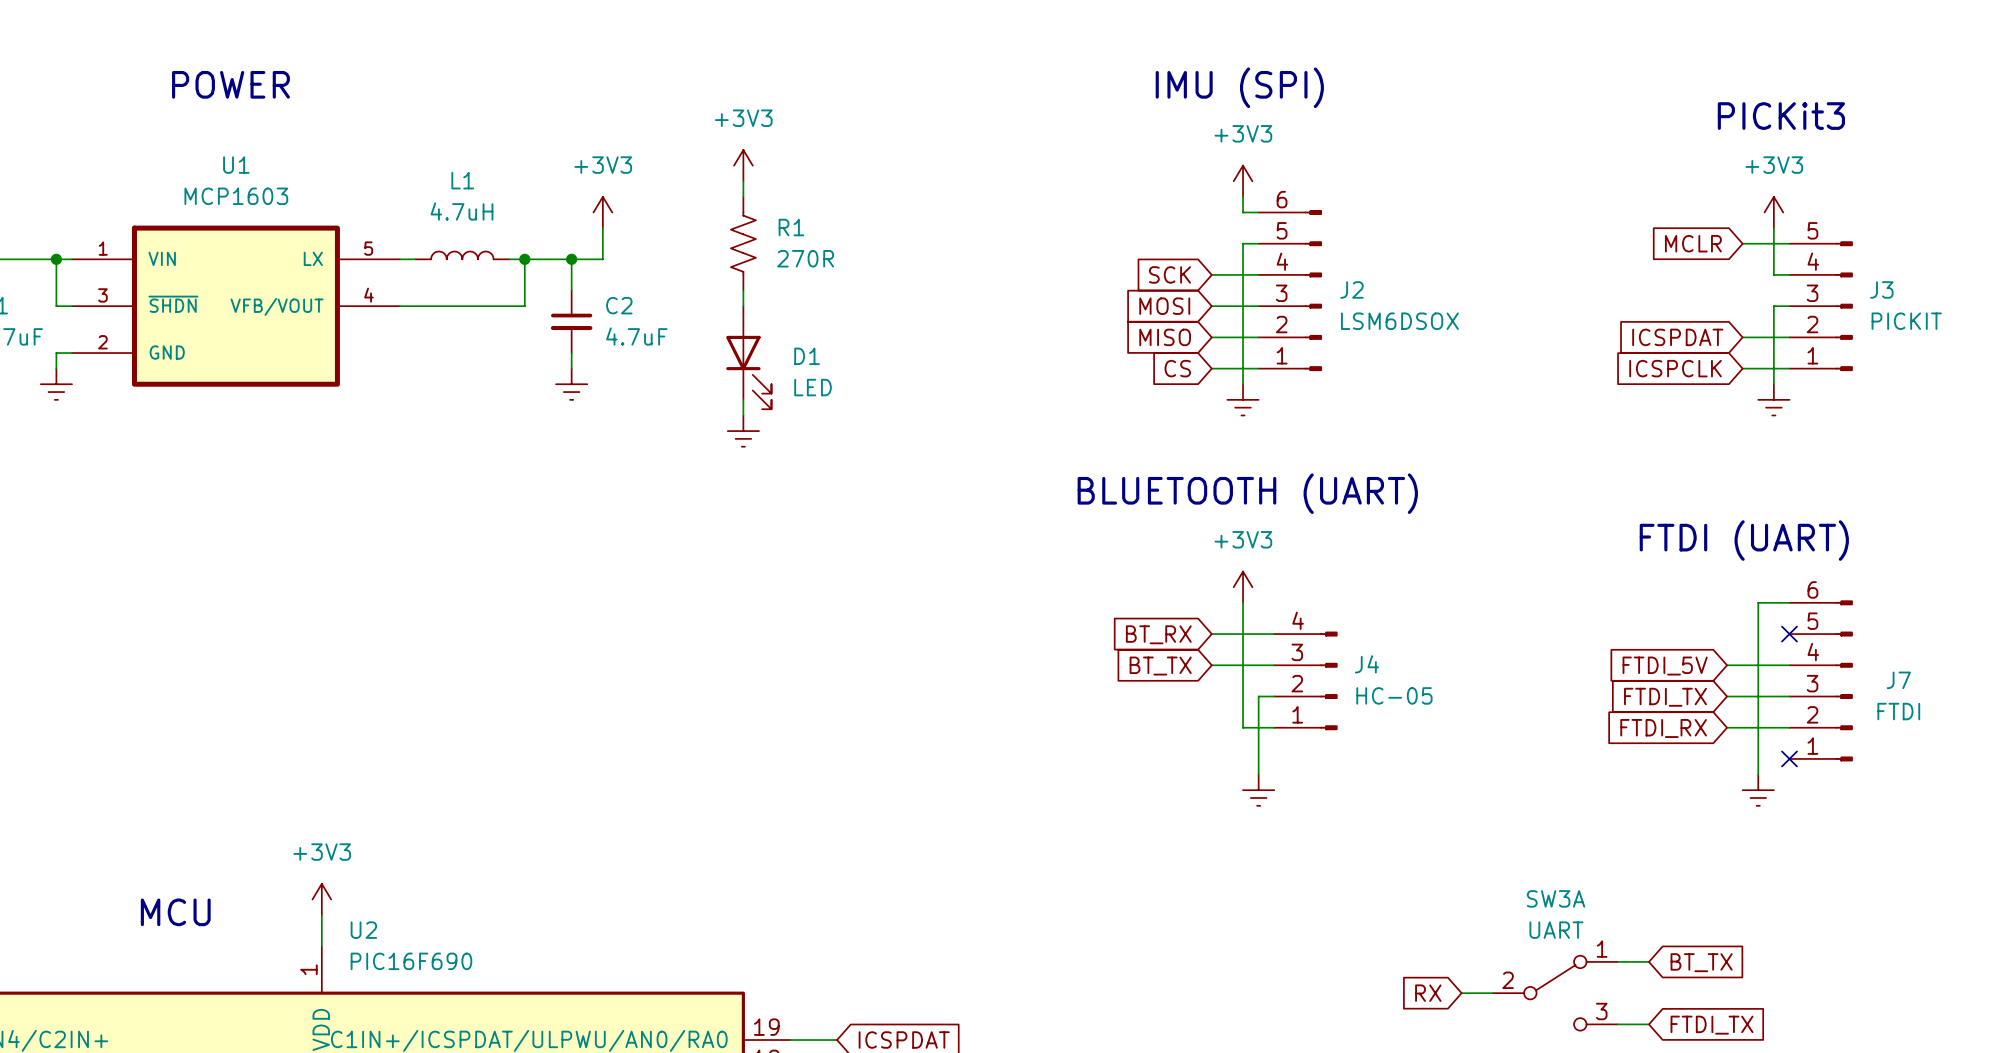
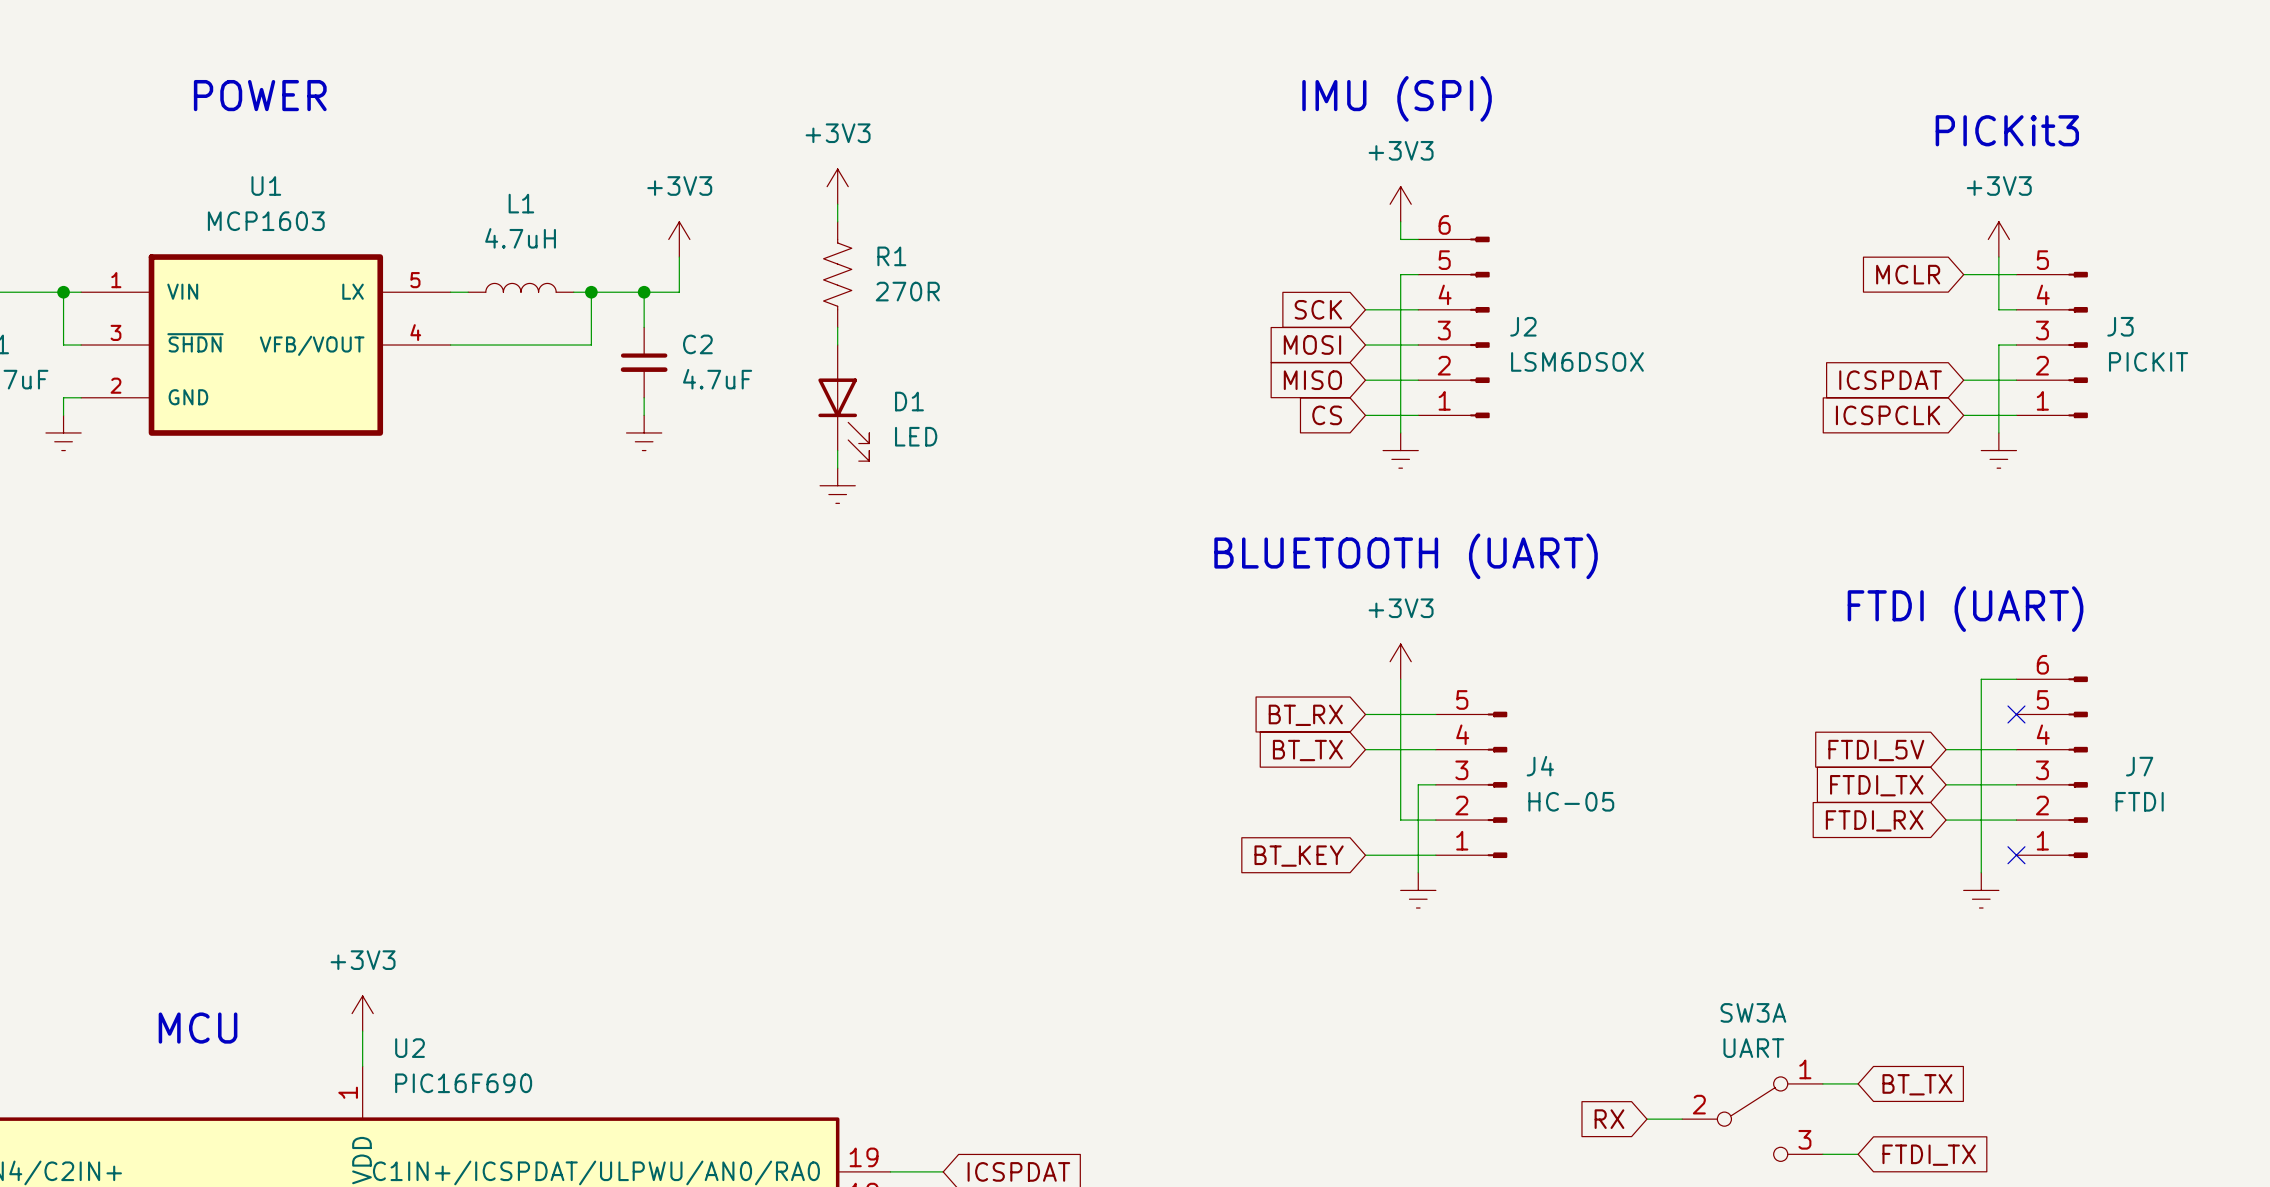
J4 symbol: [1274, 631, 1338, 731] -> [1435, 711, 1508, 859]
wire: none -> (1365, 855) (1435, 855)
global label: none -> BT_KEY (1299, 856)

